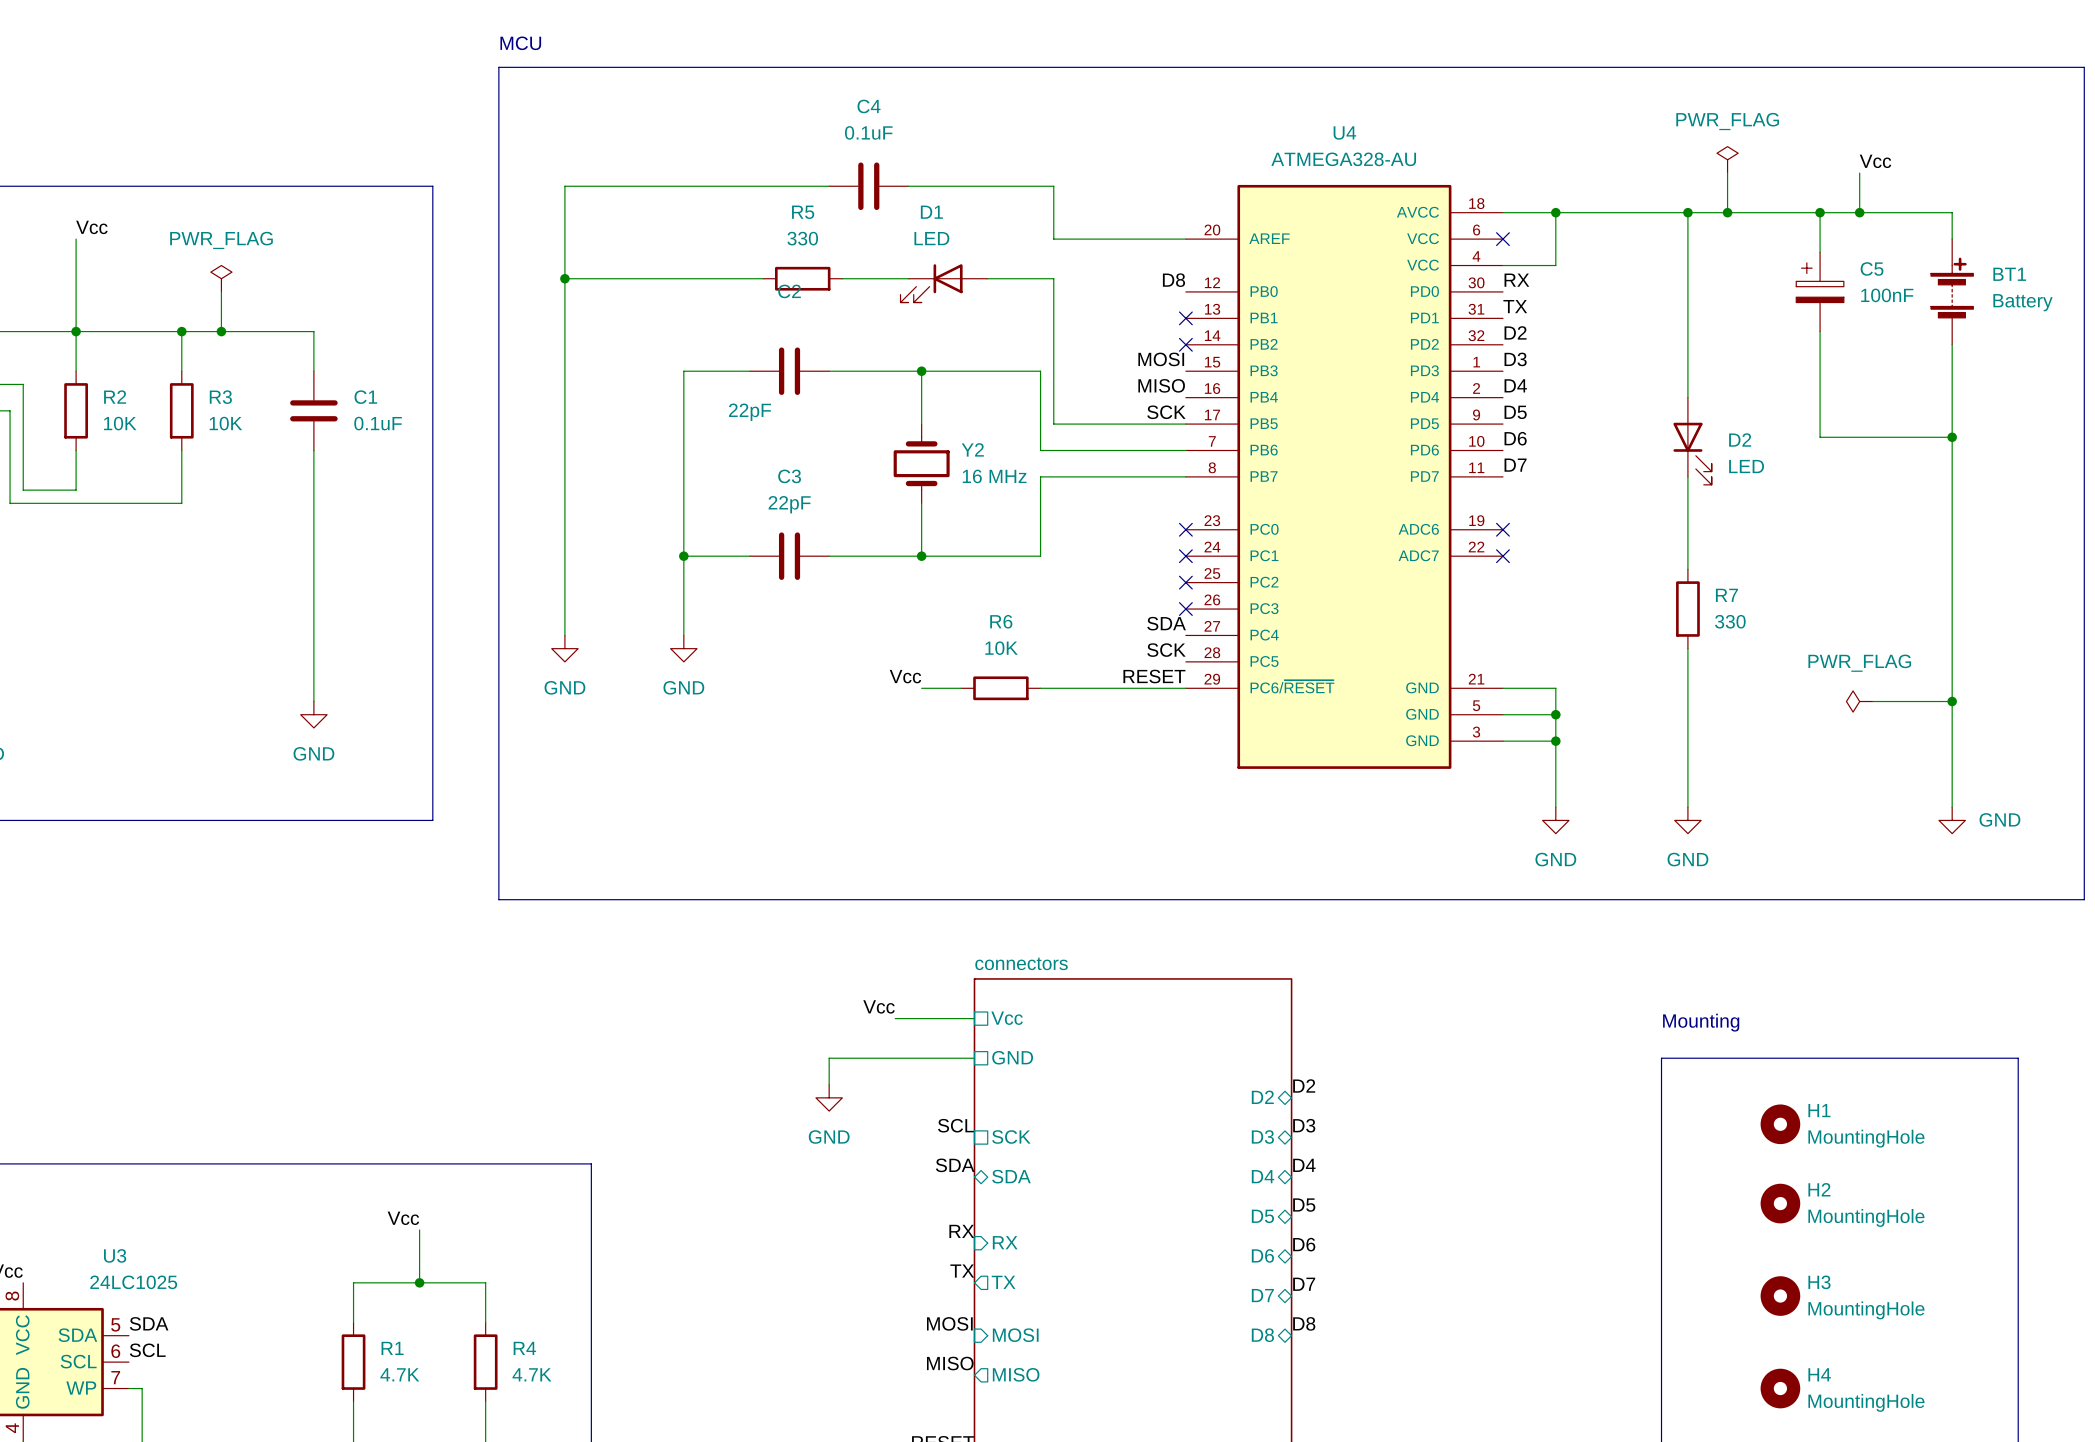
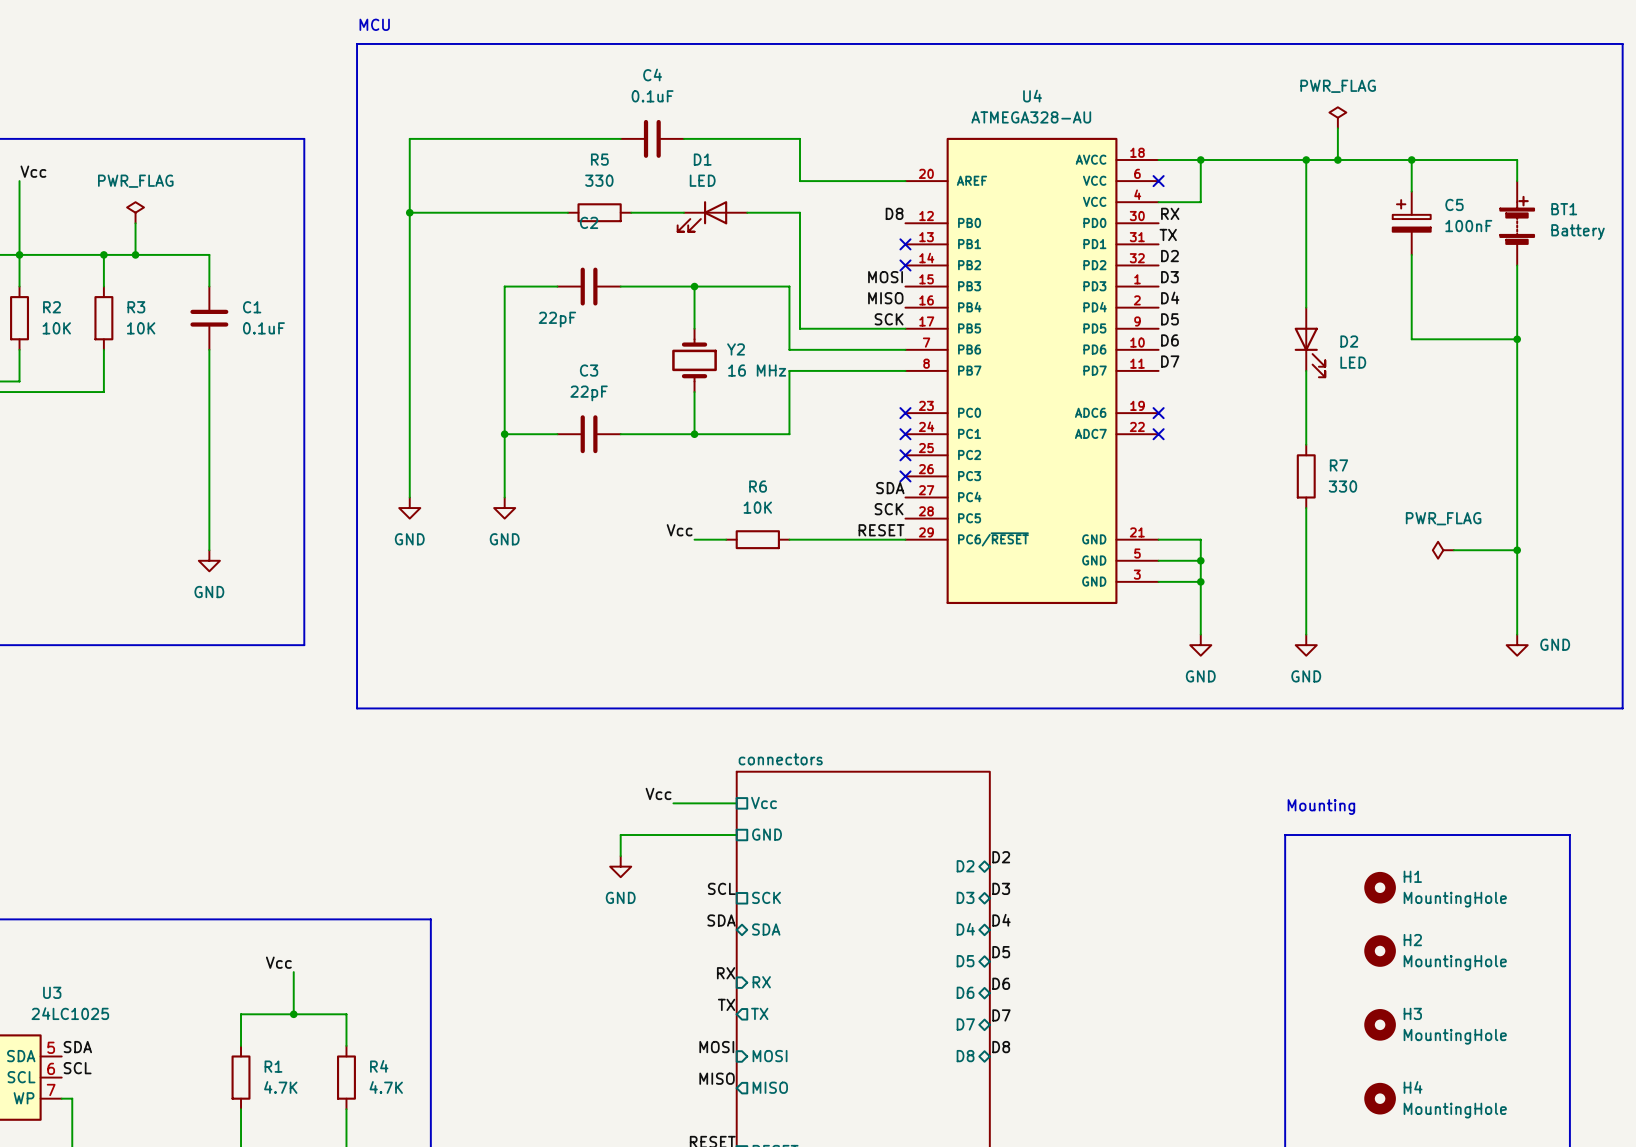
label: Vcc (1875, 161) -> none
wire: (1859, 173) (1859, 212) -> none
junction: (1859, 212) -> none

